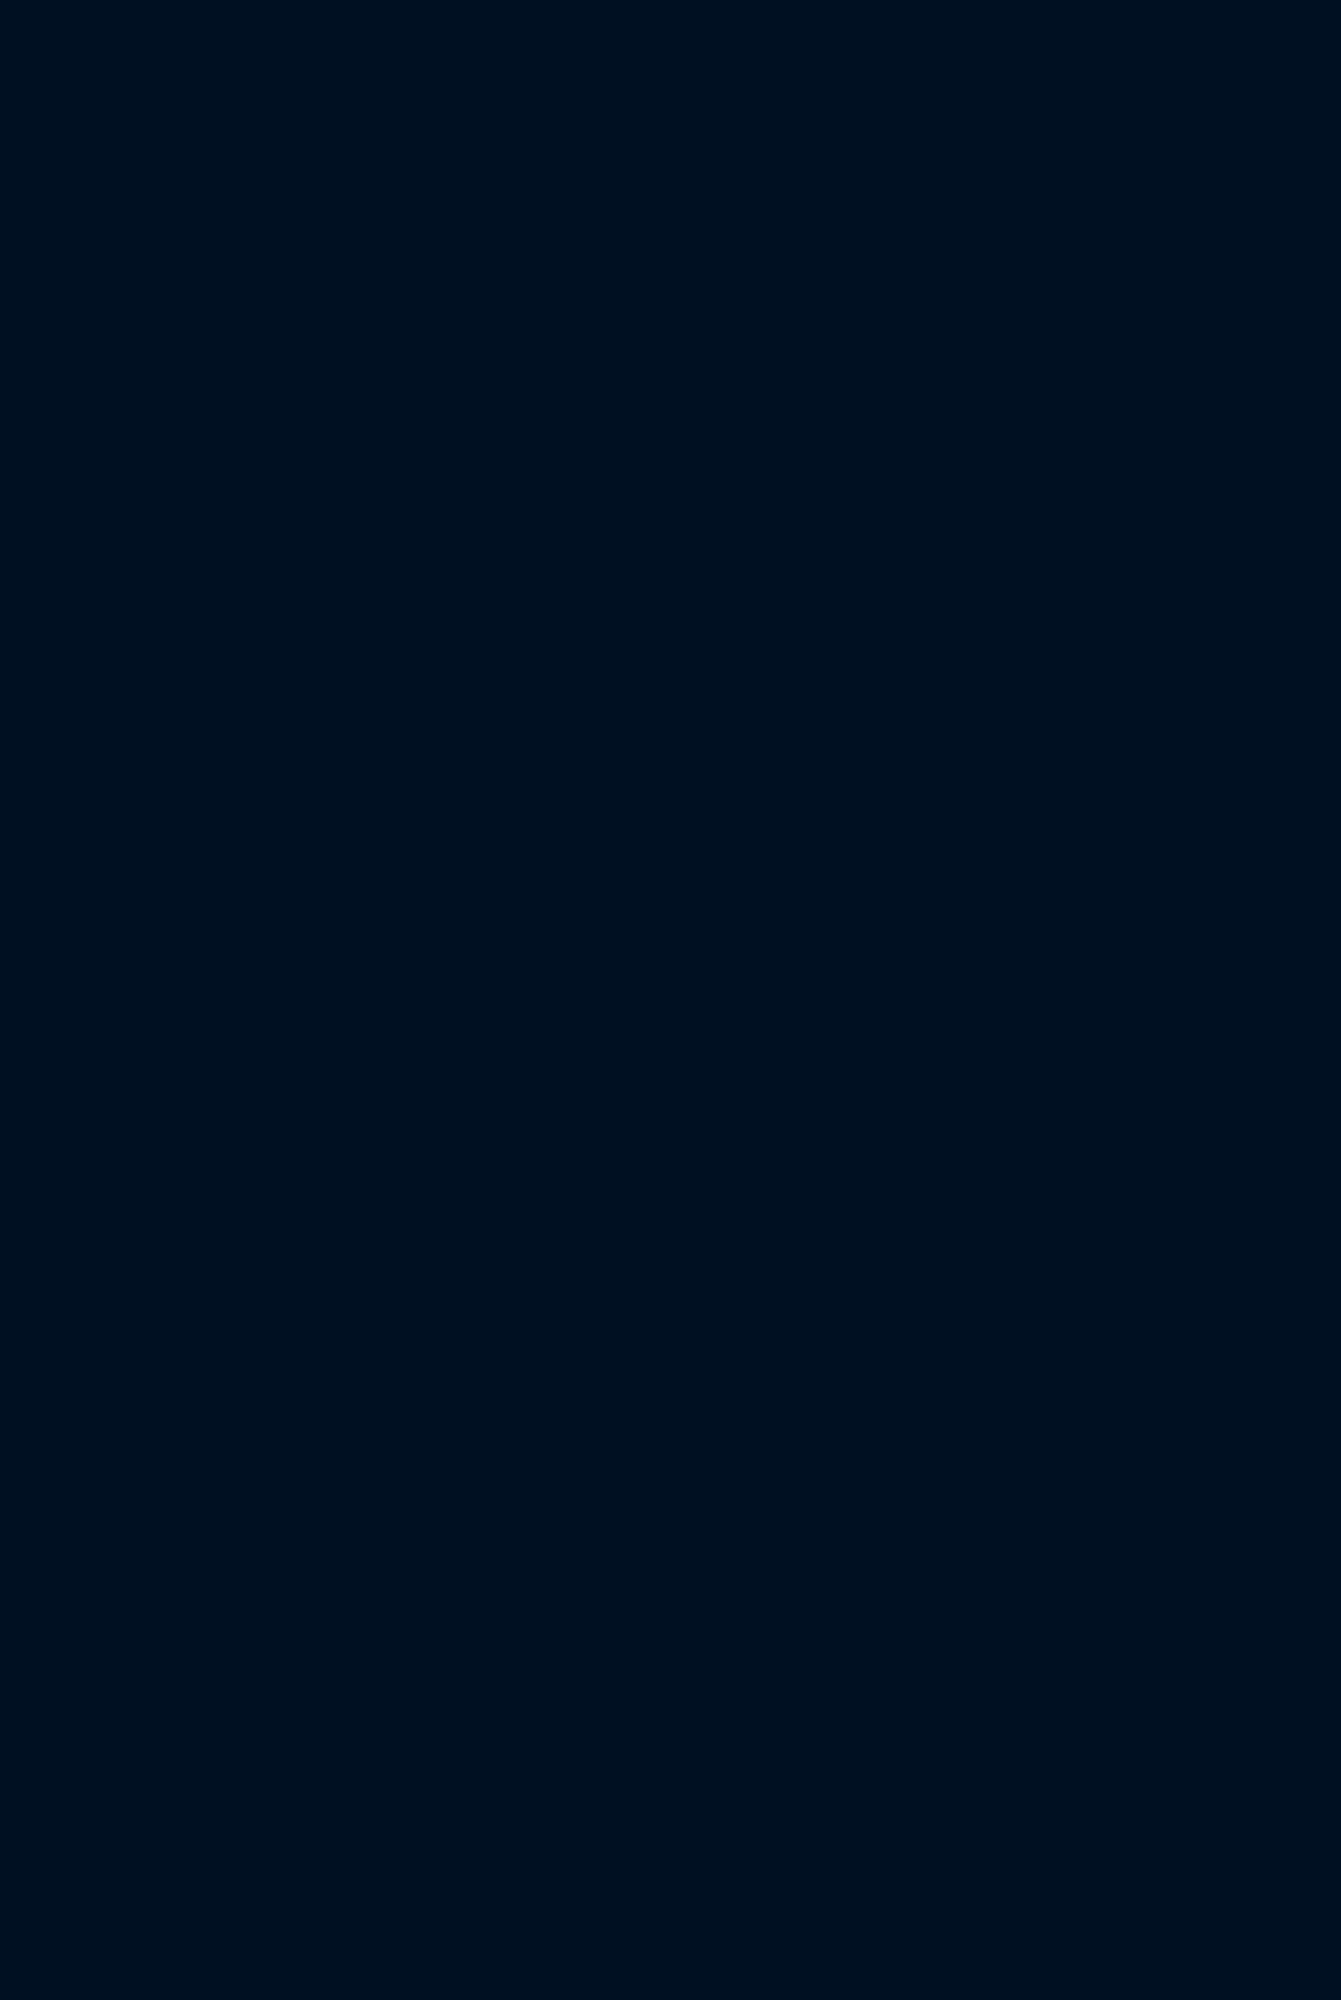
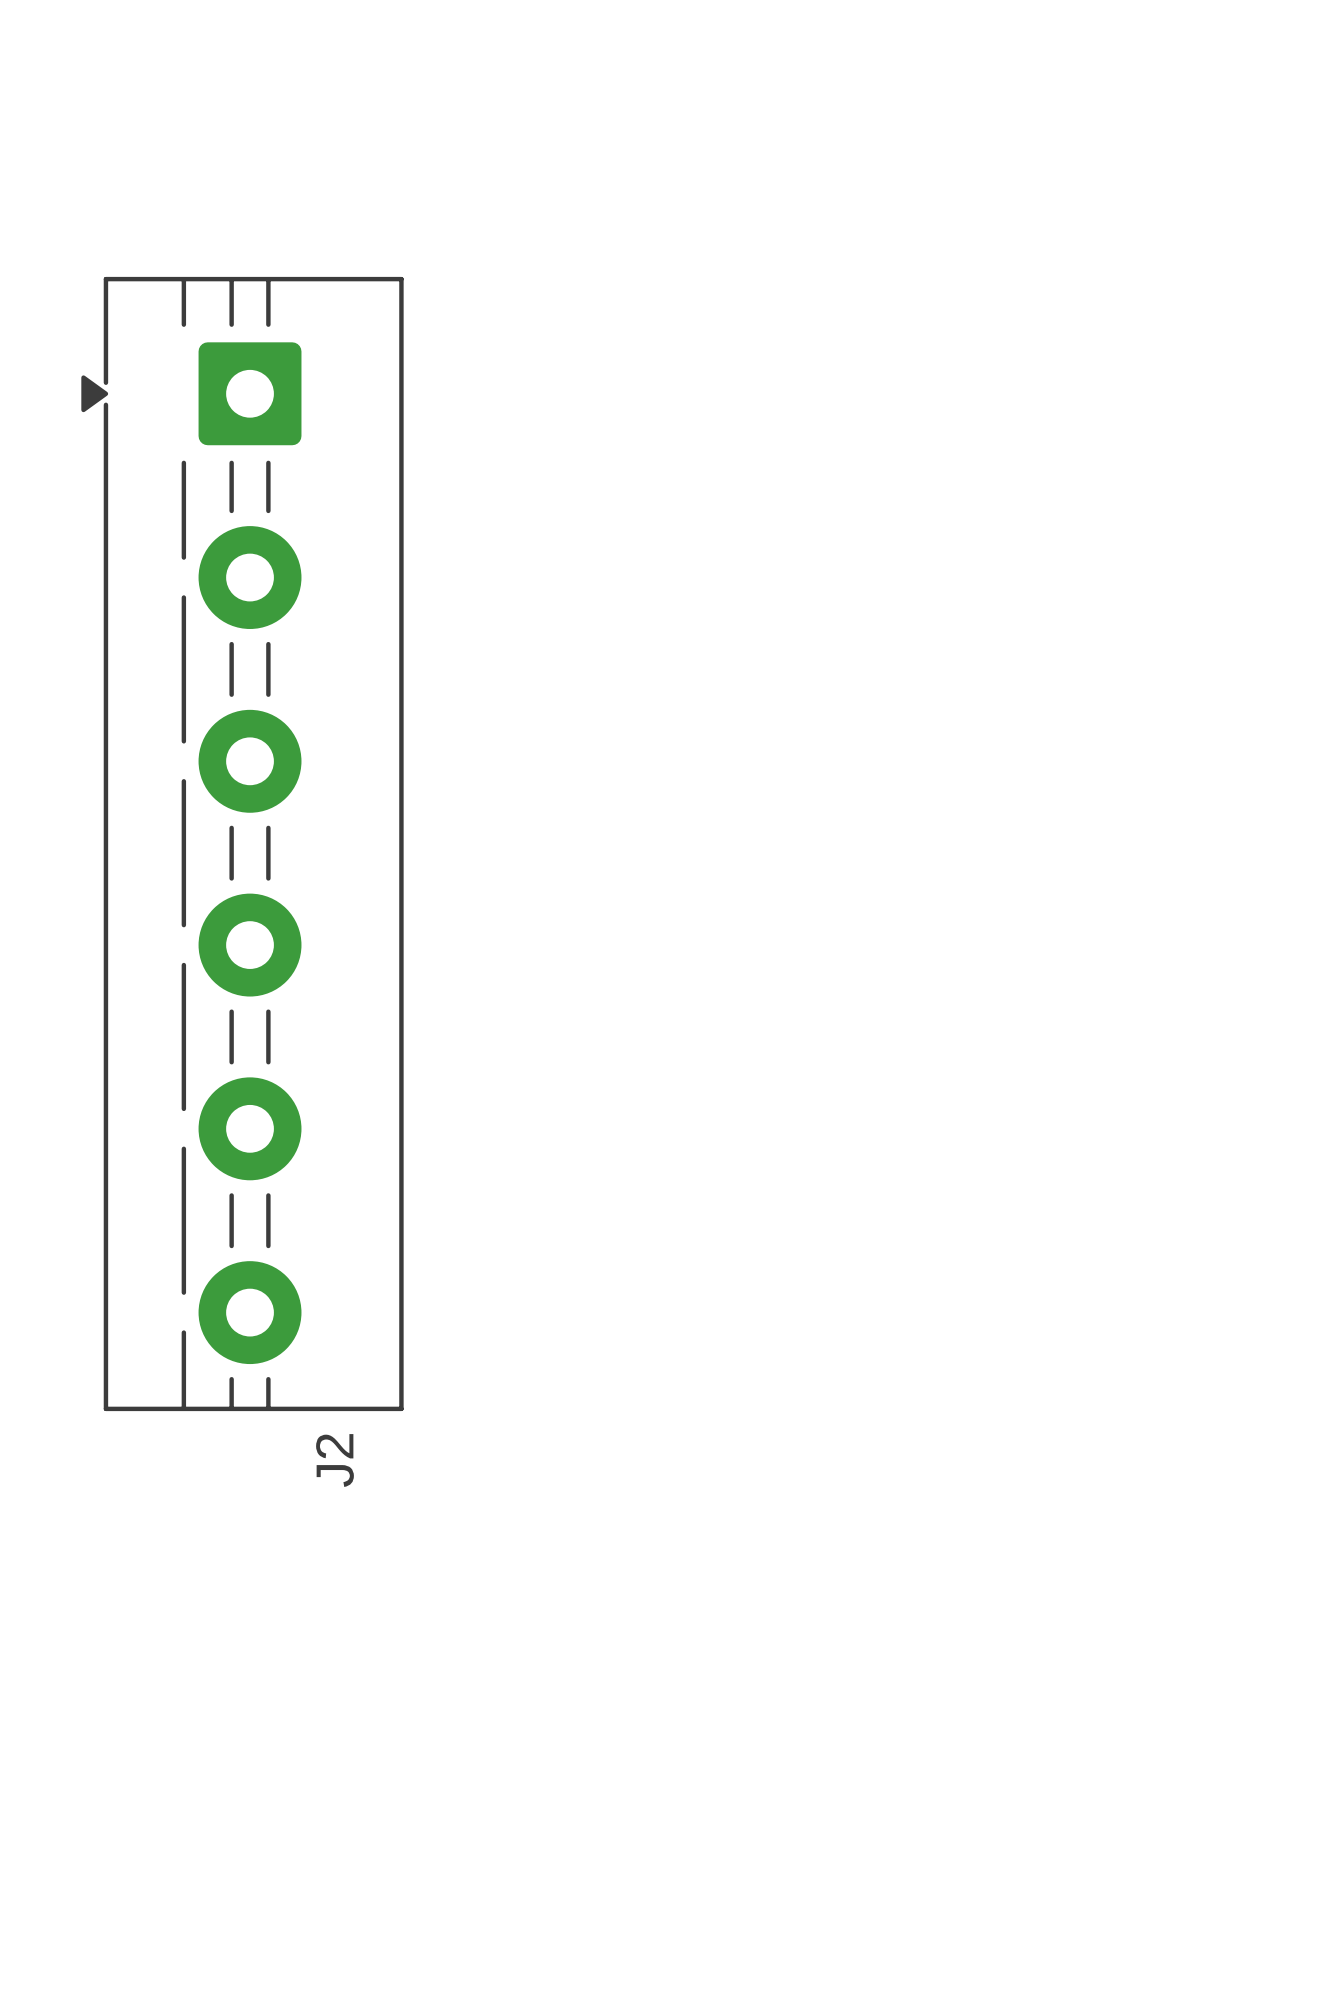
J2: none -> (242, 844)

